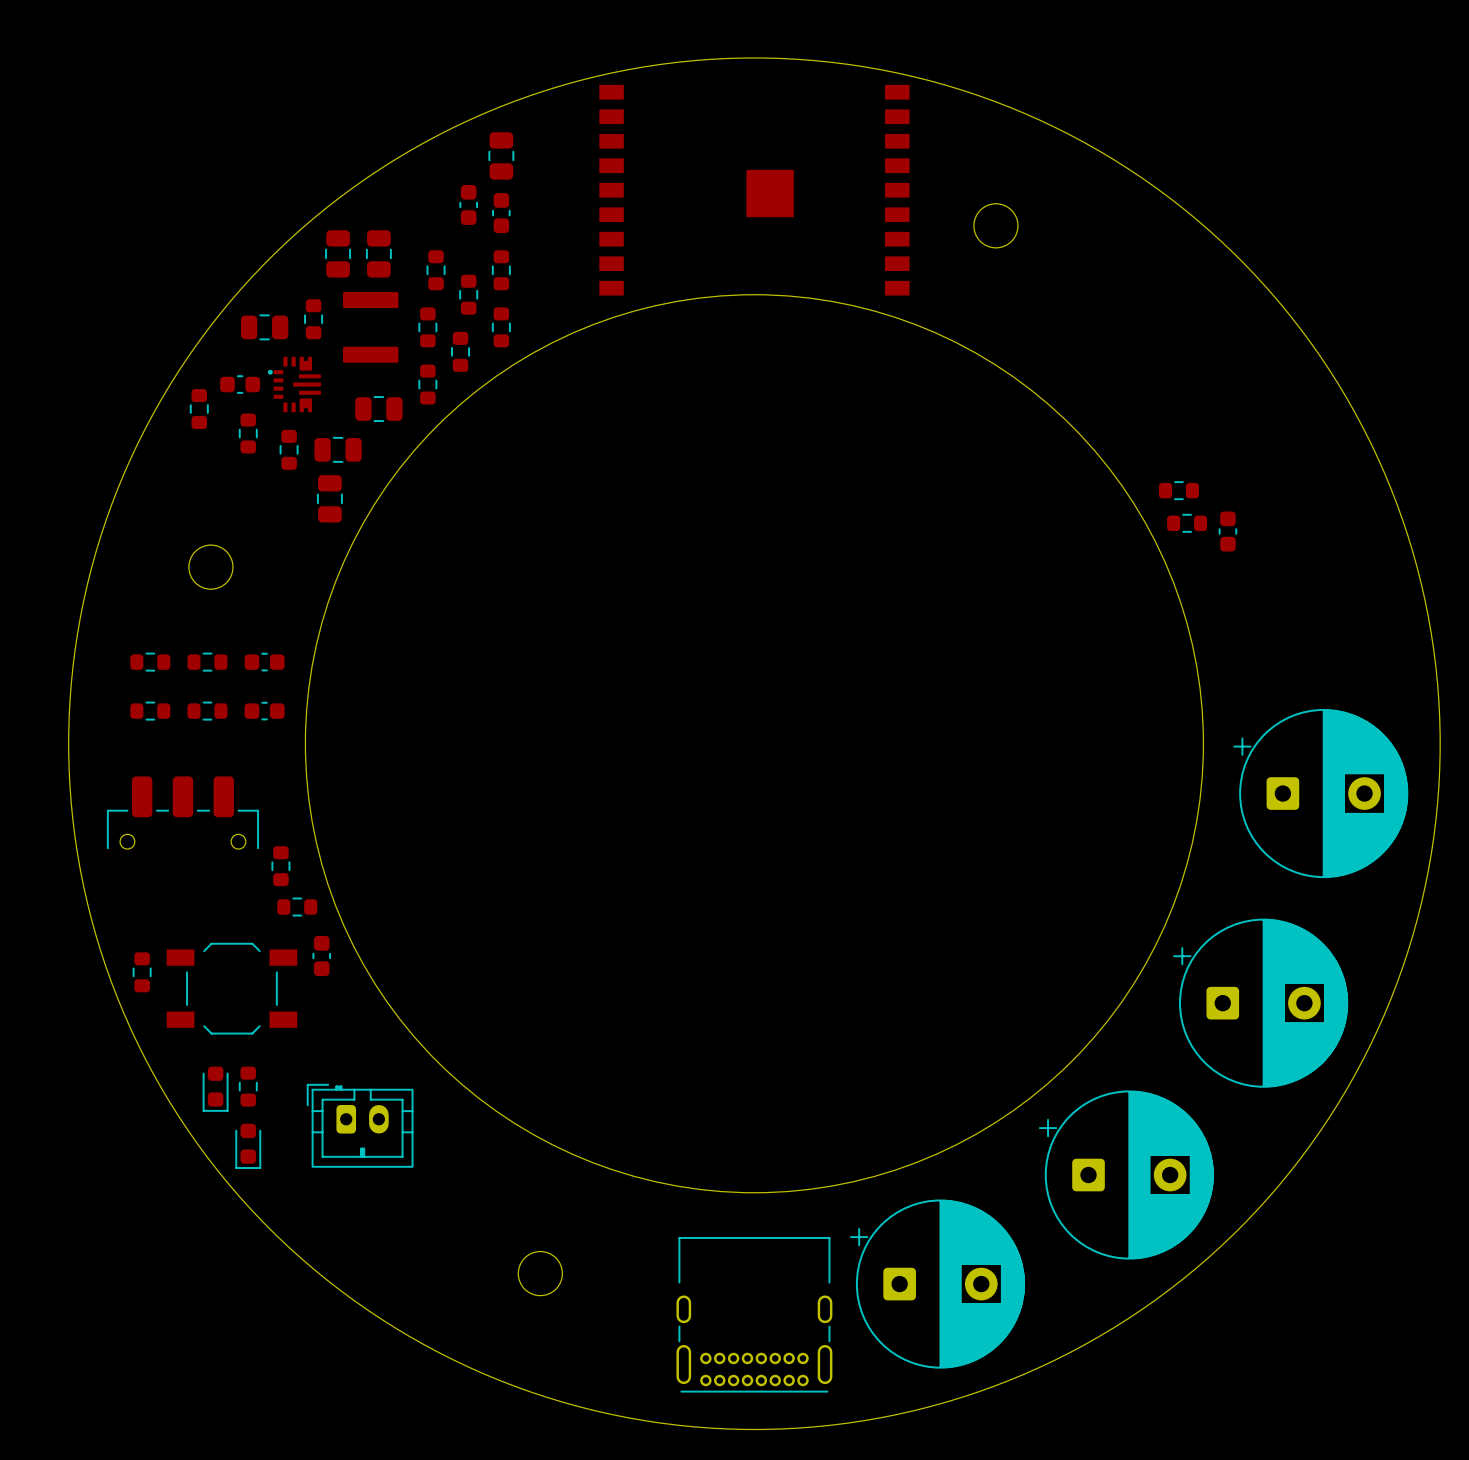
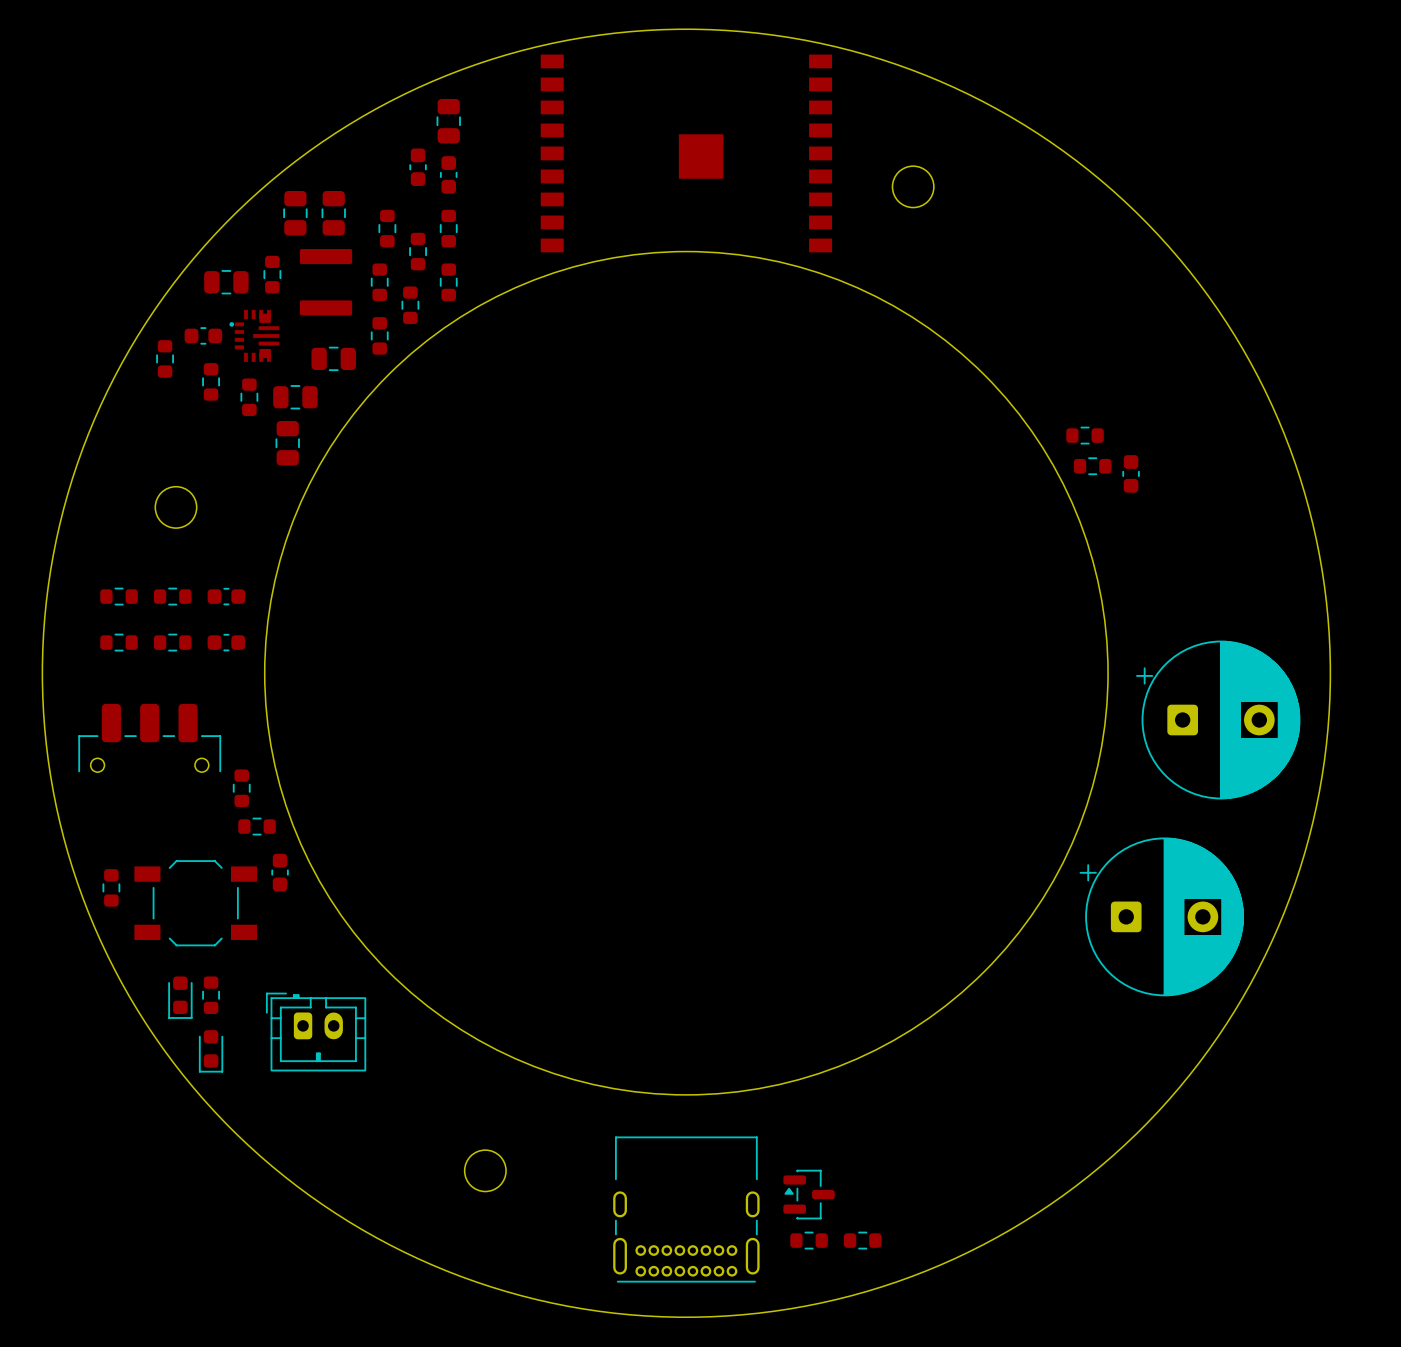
part: (1126, 1175) -> none
part: (937, 1284) -> none
part: none -> (809, 1194)
part: none -> (809, 1240)
part: none -> (862, 1240)

